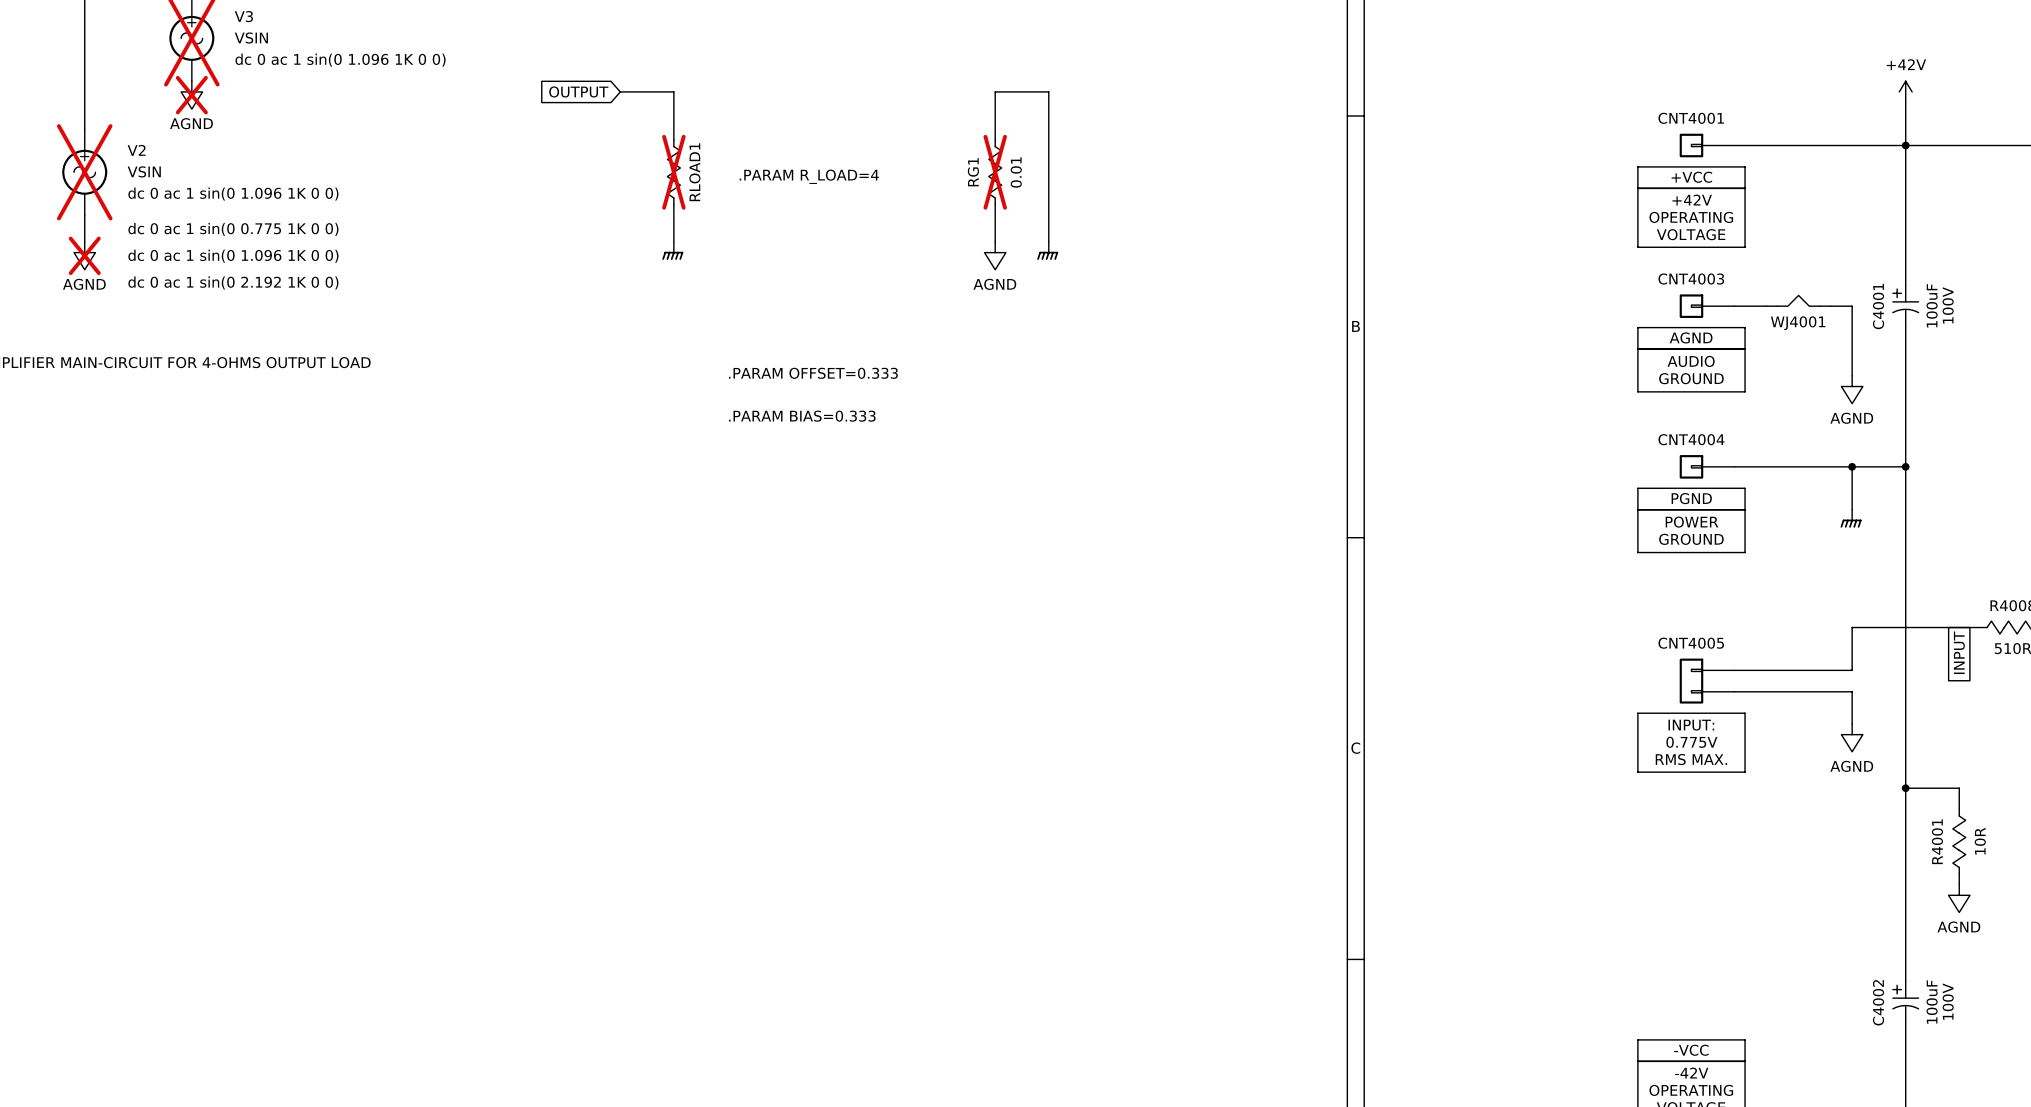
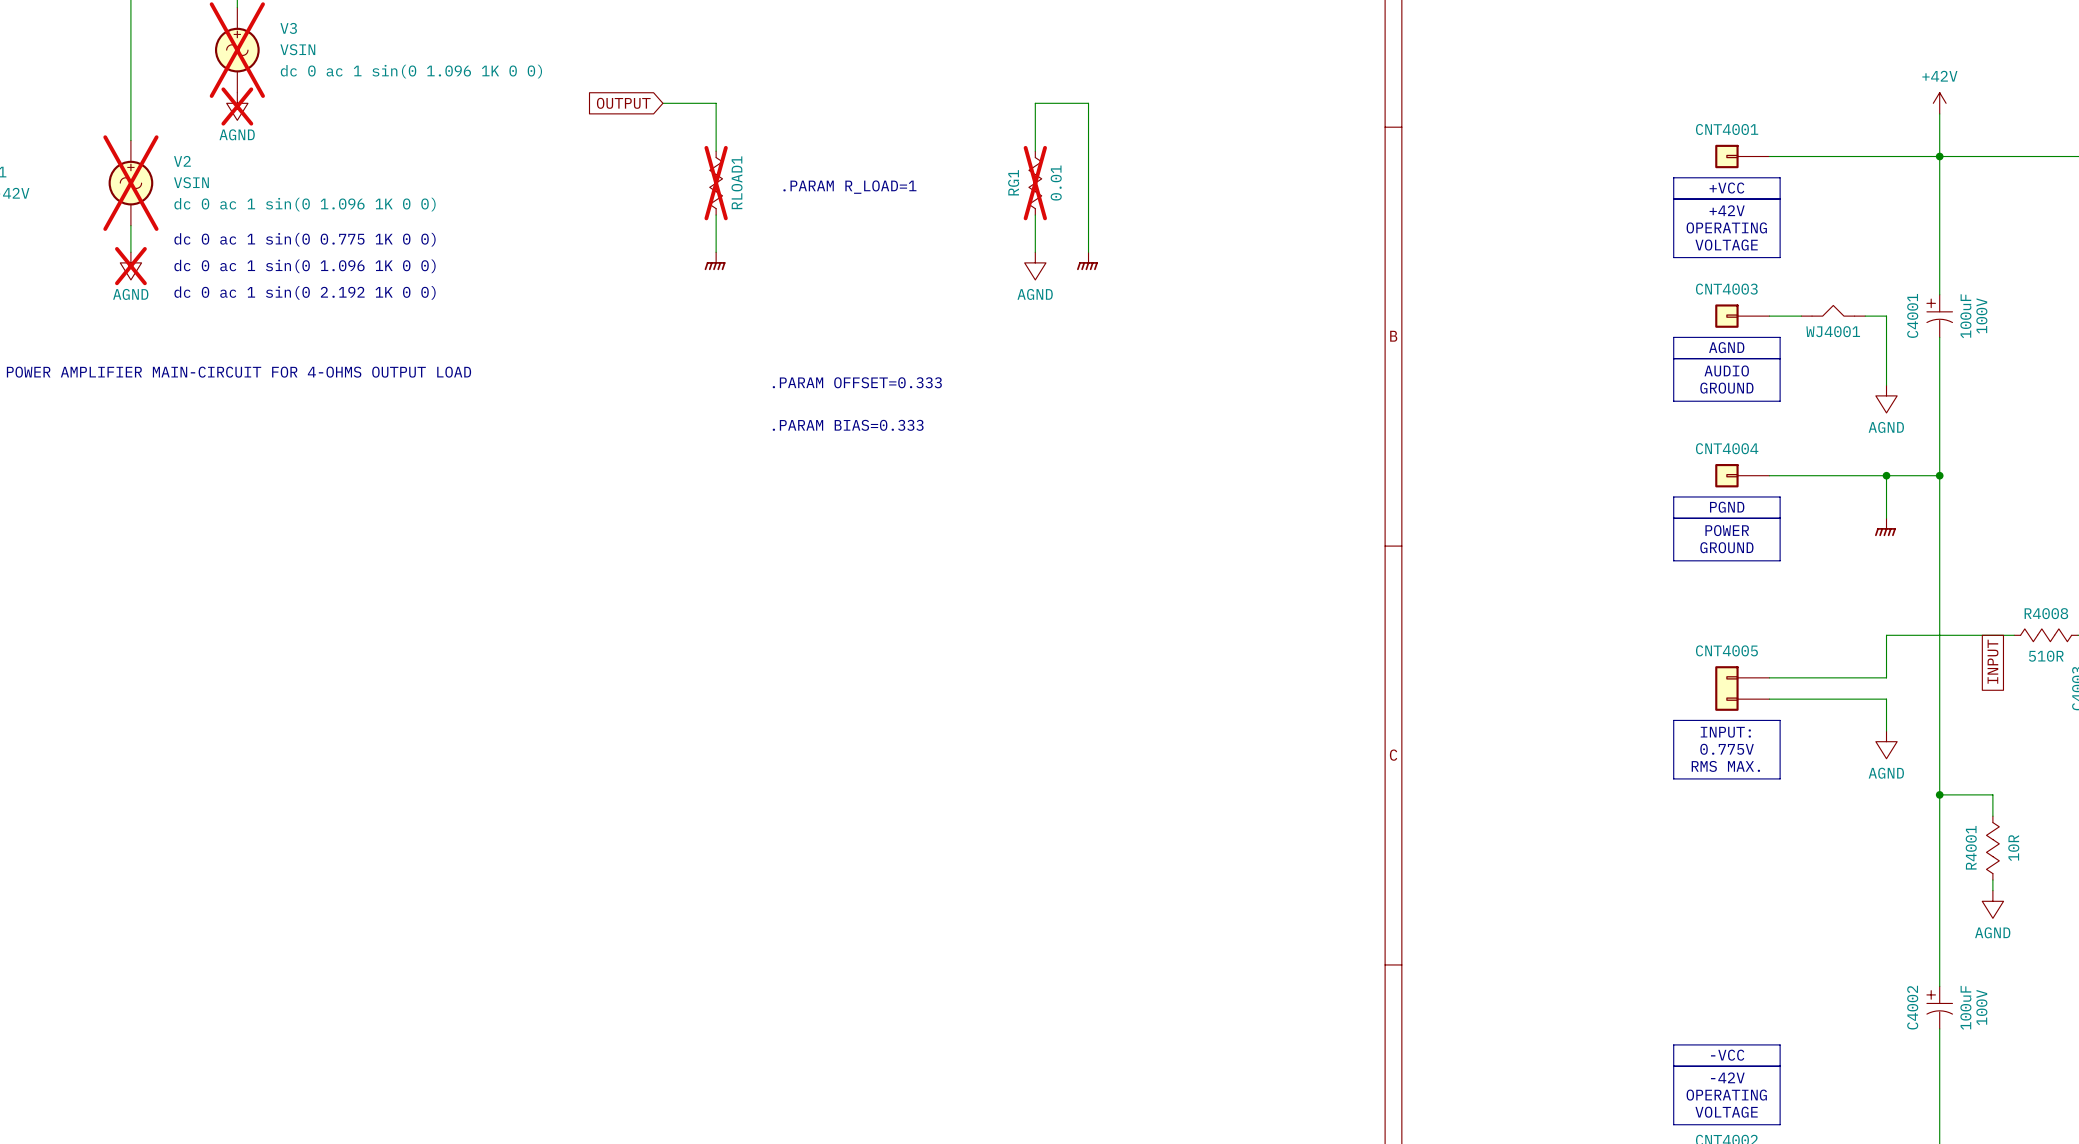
text: .PARAM R_LOAD=4 (809, 176) -> .PARAM R_LOAD=1 (849, 187)

